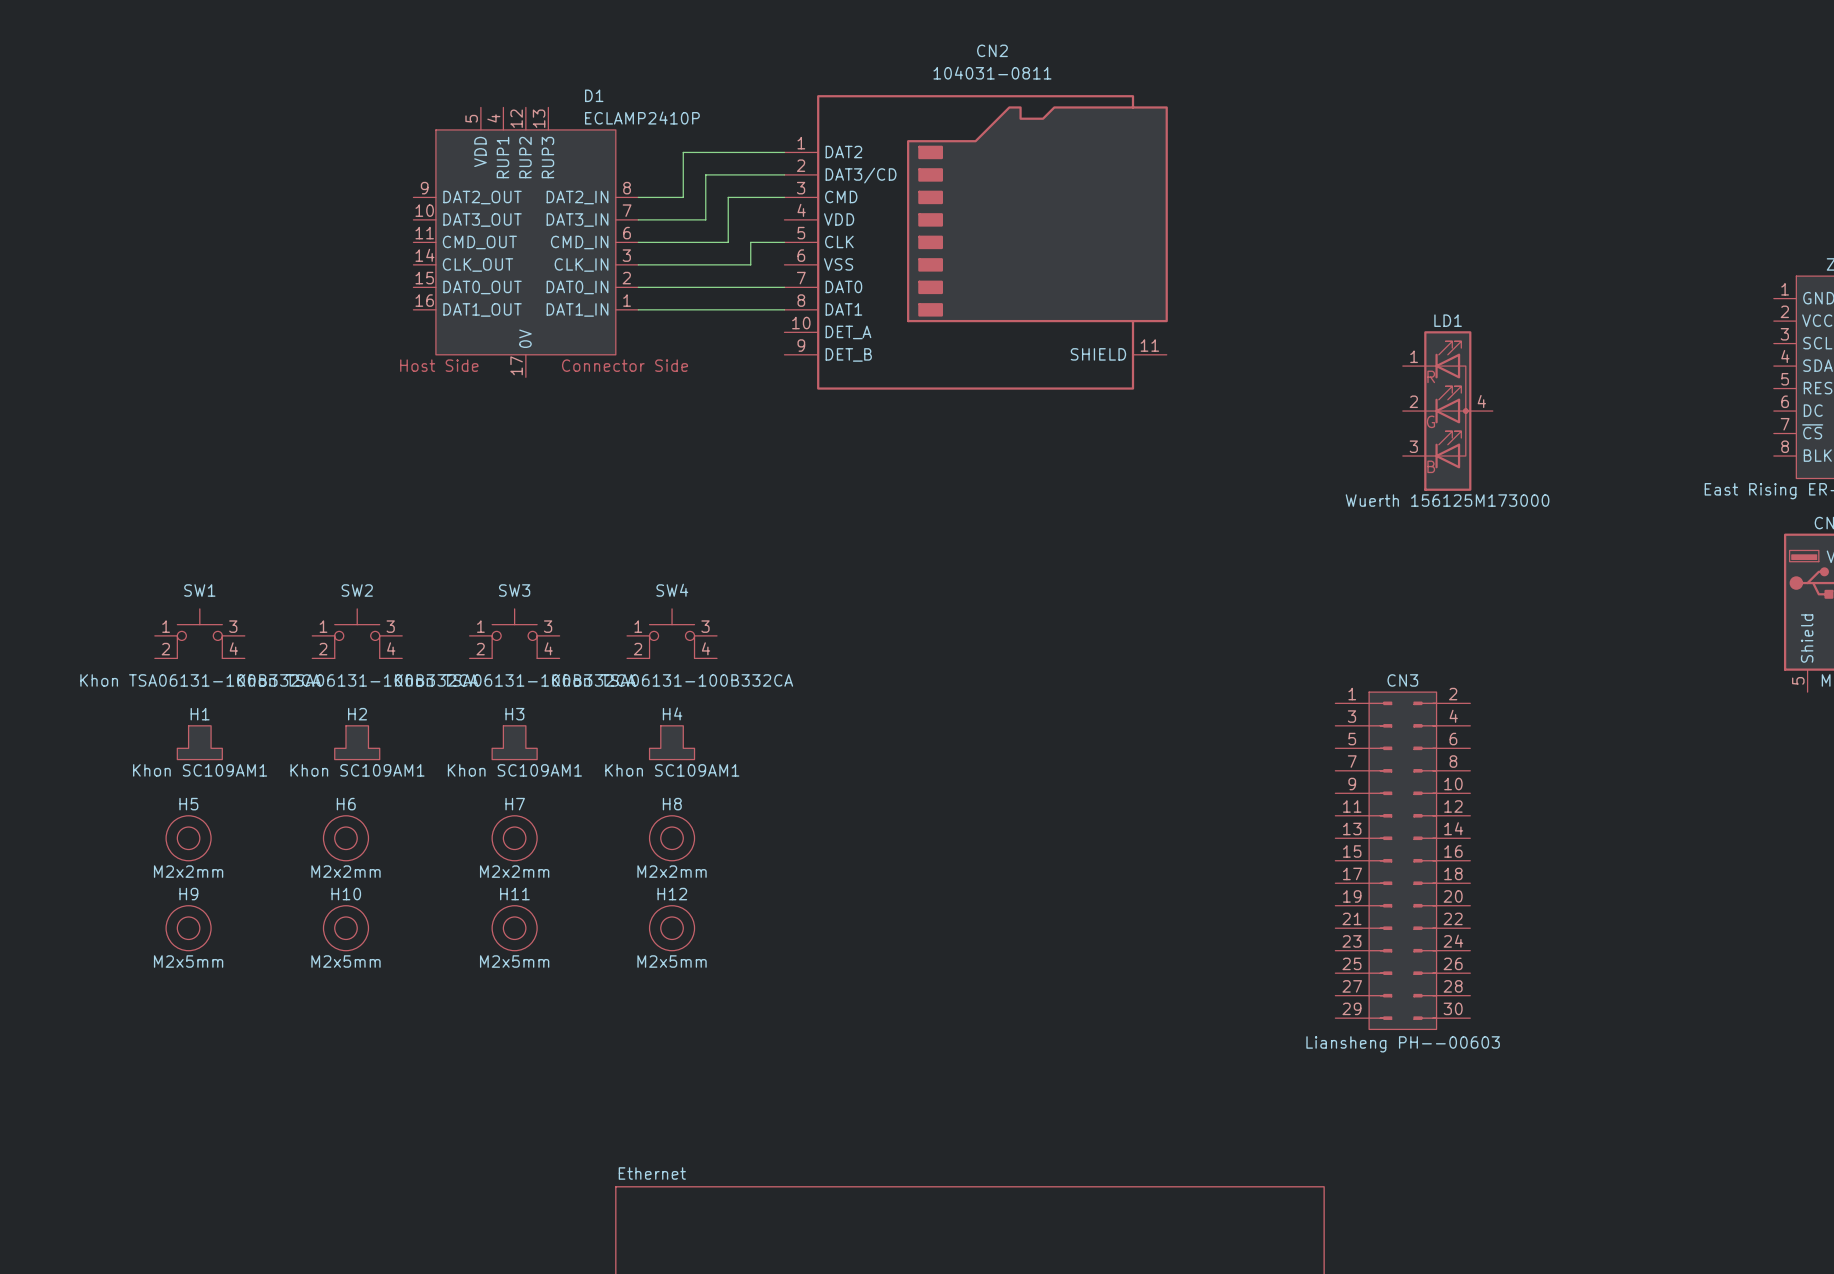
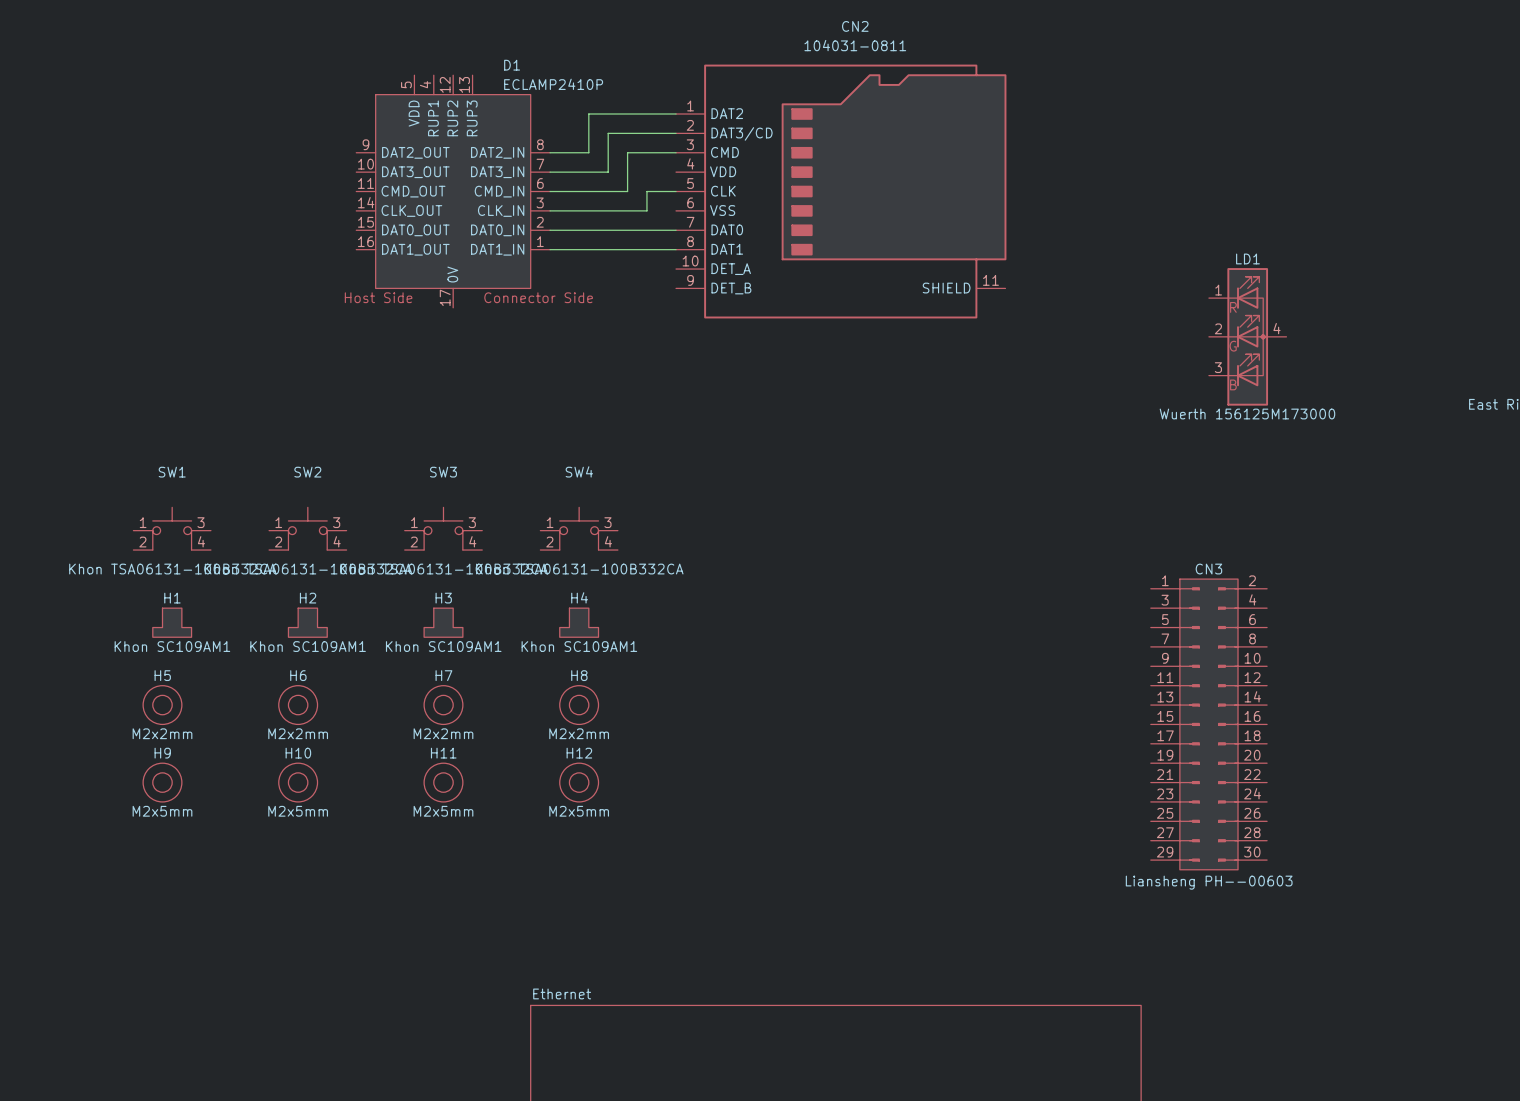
SW1 name position: SW1 (199, 590) -> SW1 (172, 472)
SW2 name position: SW2 (357, 590) -> SW2 (307, 472)
SW3 name position: SW3 (514, 590) -> SW3 (443, 472)
SW4 name position: SW4 (672, 590) -> SW4 (579, 471)

